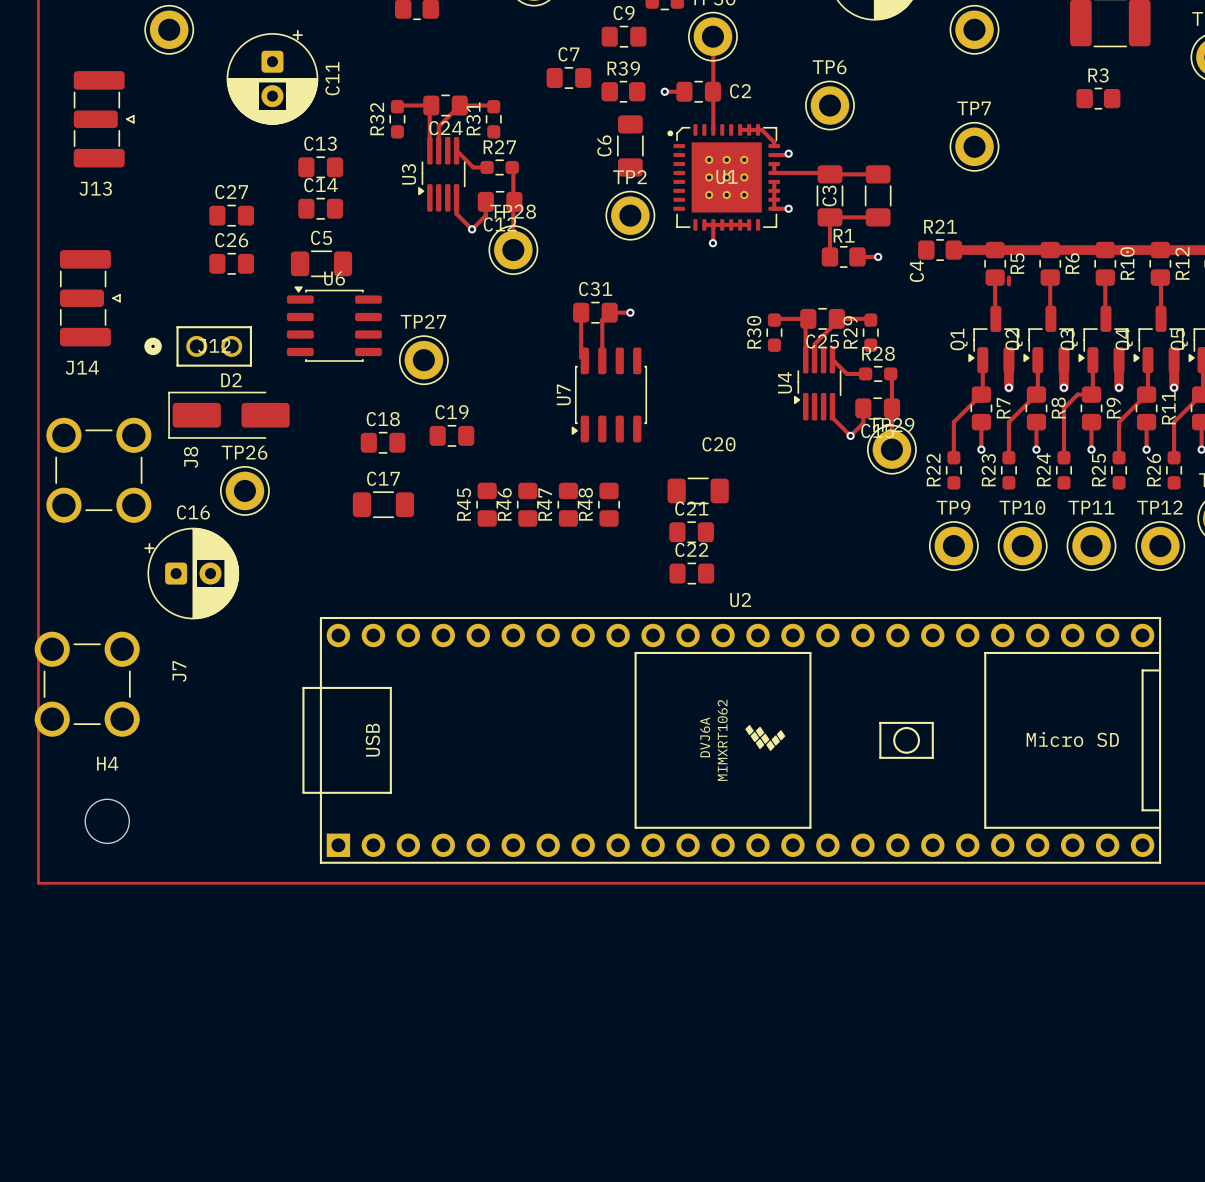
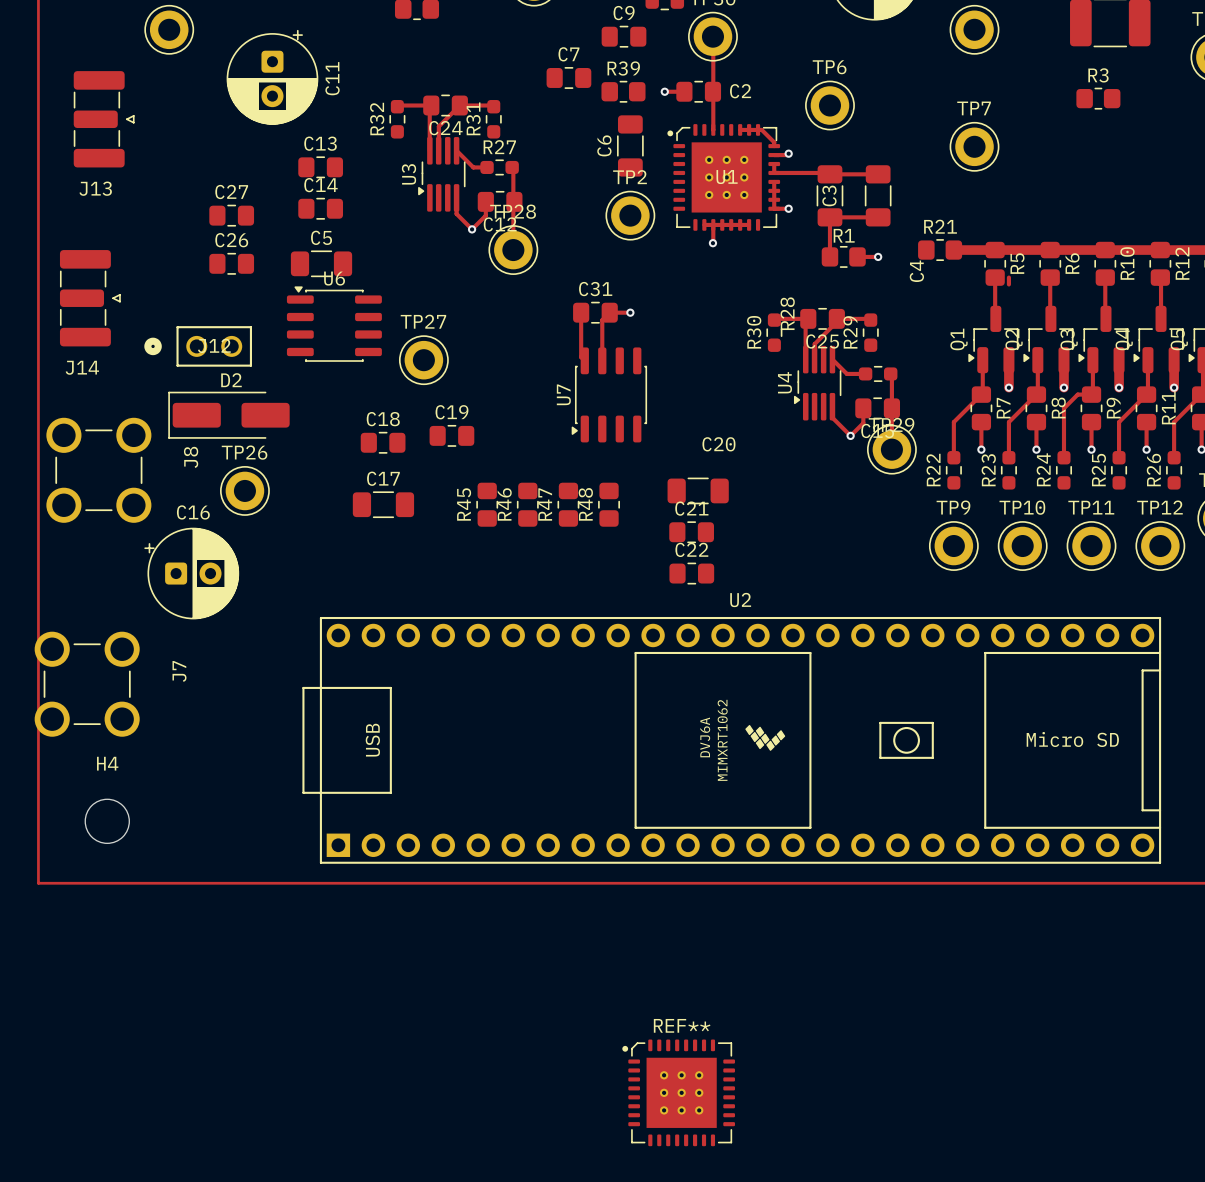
R28 name rotation: 0° (878, 353) -> 90° counterclockwise (787, 313)
R28 name position: R28 (878, 353) -> R28 (787, 313)
REF**: none -> (678, 1092)

